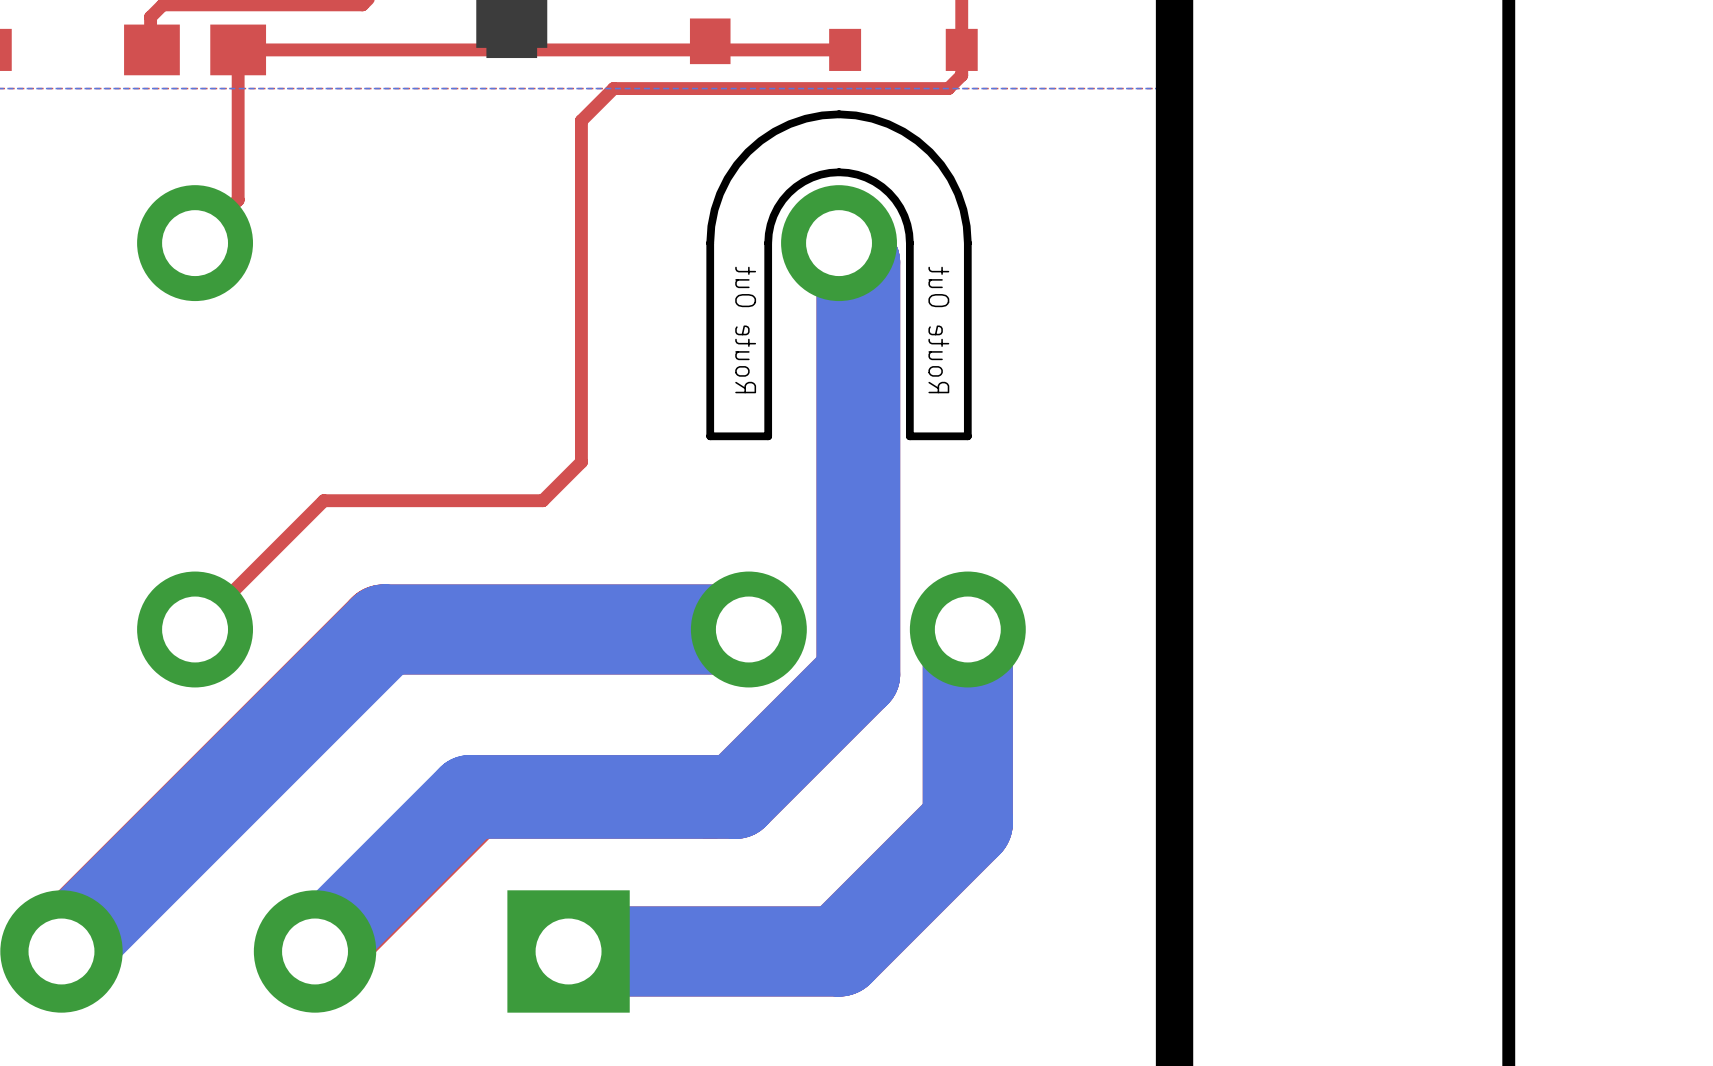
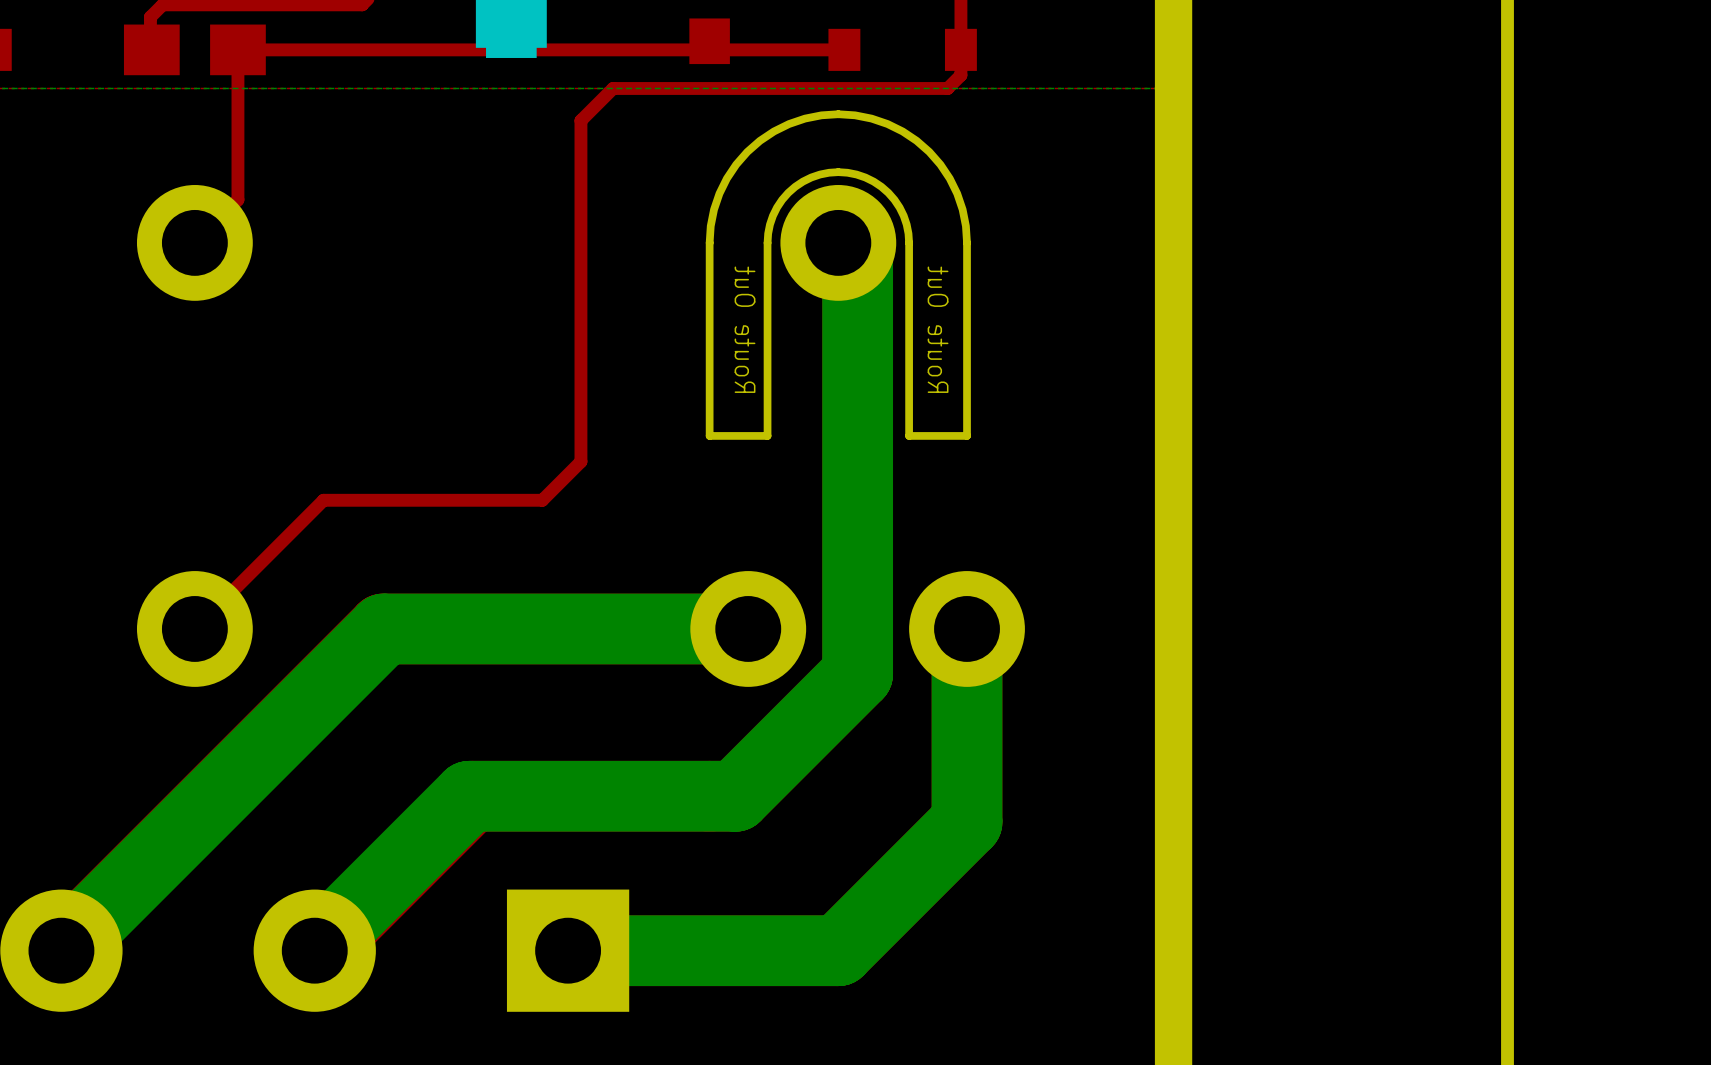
bottom track width: thick (839, 243) (858, 262) (858, 674) (735, 796) (469, 796) (315, 951) -> thin (838, 242) (857, 262) (857, 674) (735, 796) (469, 796) (314, 950)
bottom track width: thick (748, 629) (384, 629) (62, 951) -> thin (748, 628) (384, 628) (62, 950)
bottom track width: thick (967, 629) (967, 822) (839, 951) (568, 951) -> thin (967, 628) (967, 822) (838, 950) (568, 950)

